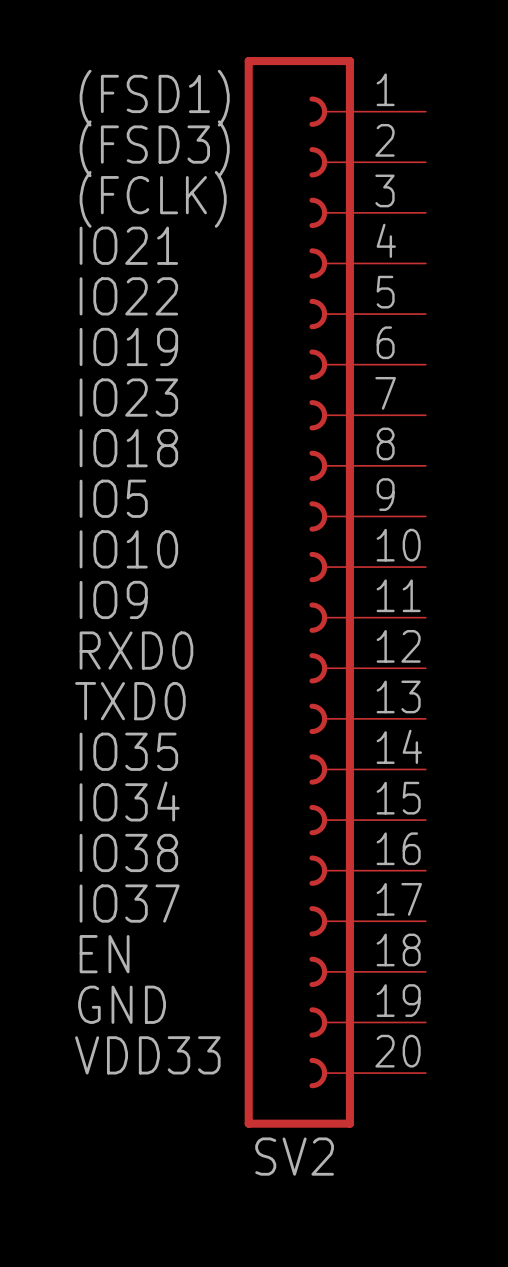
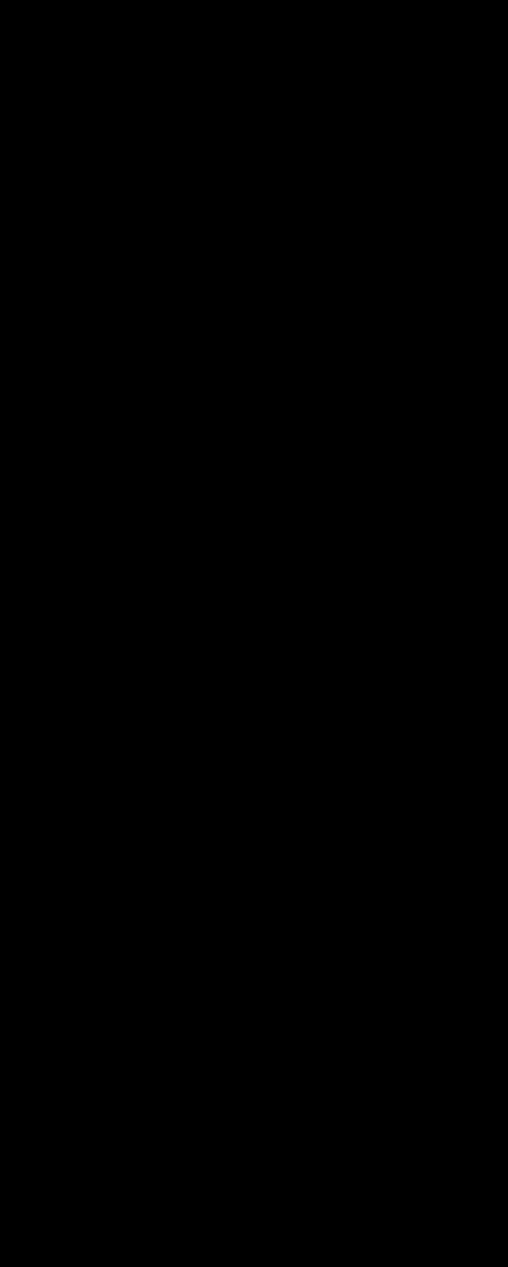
text: (FSD1) (154, 98) -> none
text: (FSD3) (154, 148) -> none
text: (FCLK) (153, 199) -> none
text: IO21 (128, 245) -> none
text: IO22 (128, 296) -> none
text: IO19 (128, 346) -> none
text: IO23 (128, 397) -> none
text: IO18 (128, 448) -> none
text: IO5 (113, 498) -> none
text: IO10 (128, 549) -> none
SV2: (335, 592) -> none
text: IO9 (113, 599) -> none
text: RXD0 (136, 650) -> none
text: TXD0 (130, 701) -> none
text: IO35 (128, 751) -> none
text: IO34 (129, 801) -> none
text: IO38 (128, 852) -> none
text: IO37 (129, 903) -> none
text: EN (104, 954) -> none
text: GND (122, 1004) -> none
text: VDD33 (147, 1055) -> none

